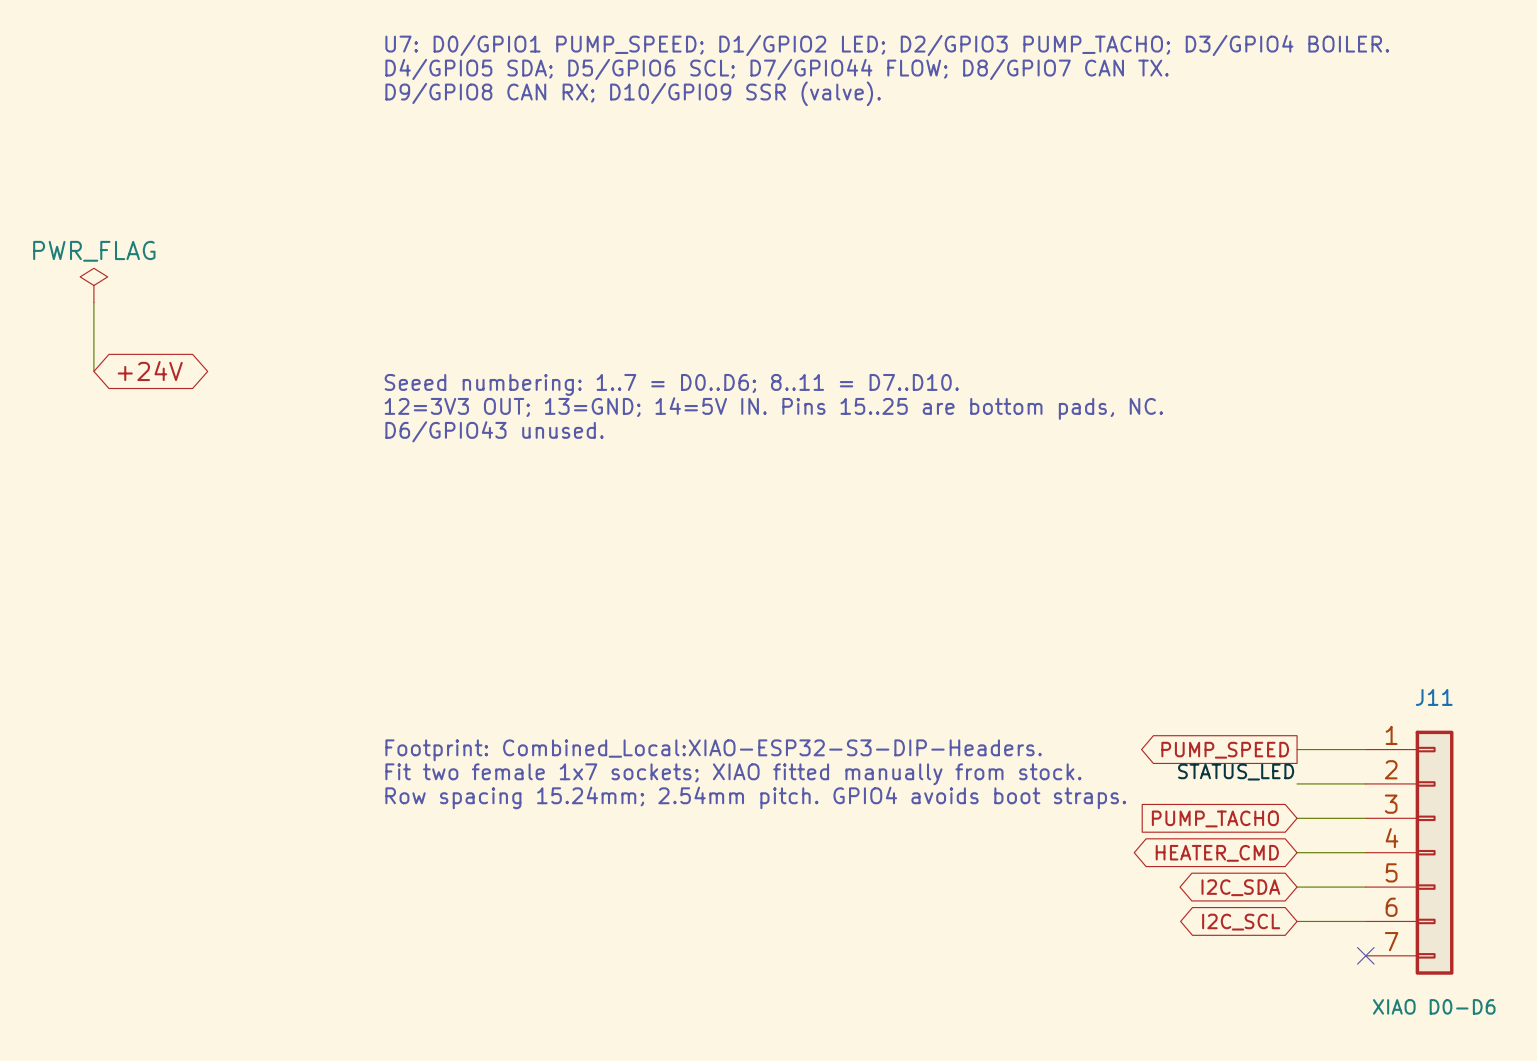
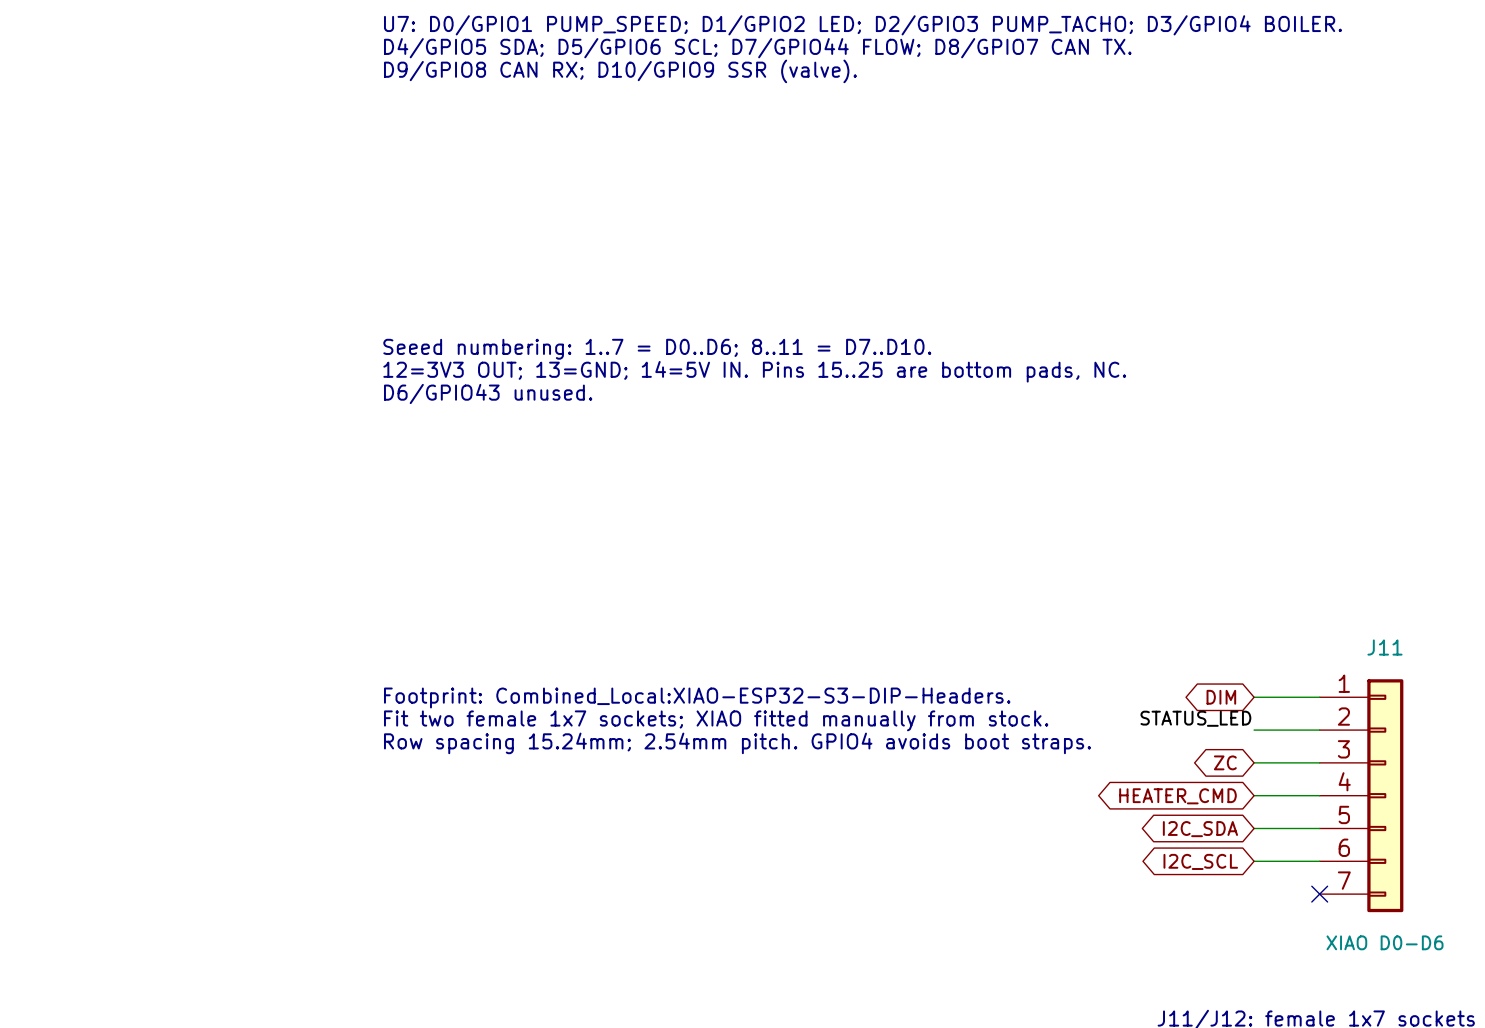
power symbol: PWR_FLAG (93, 285) -> none
wire: (93, 302) (93, 371) -> none
global label: +24V (150, 371) -> none
global label shape: output (1225, 750) -> bidirectional (1221, 697)
global label: PUMP_SPEED (1225, 750) -> DIM (1221, 697)
global label shape: input (1215, 818) -> bidirectional (1225, 762)
global label: PUMP_TACHO (1215, 818) -> ZC (1225, 762)

